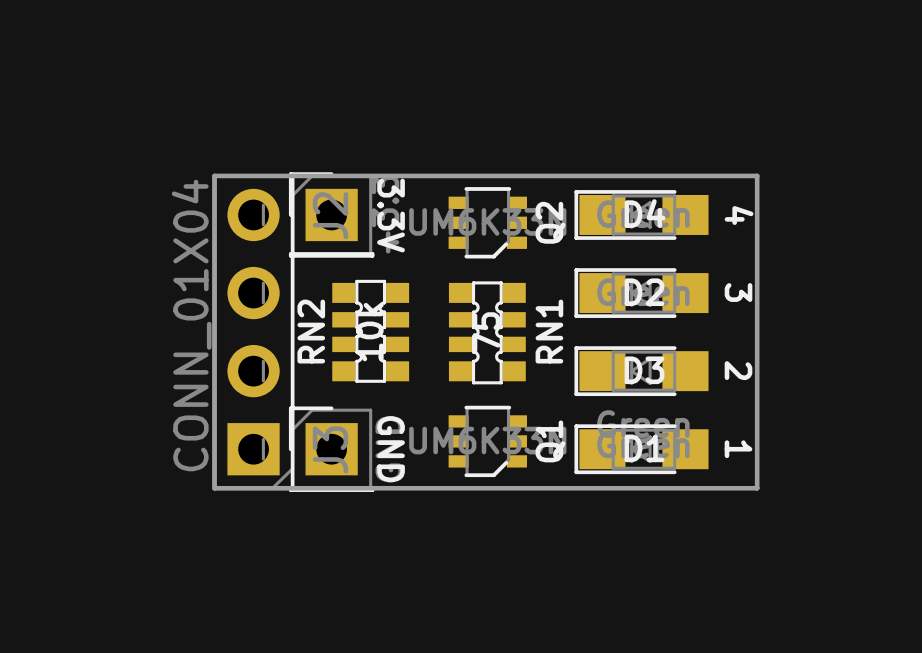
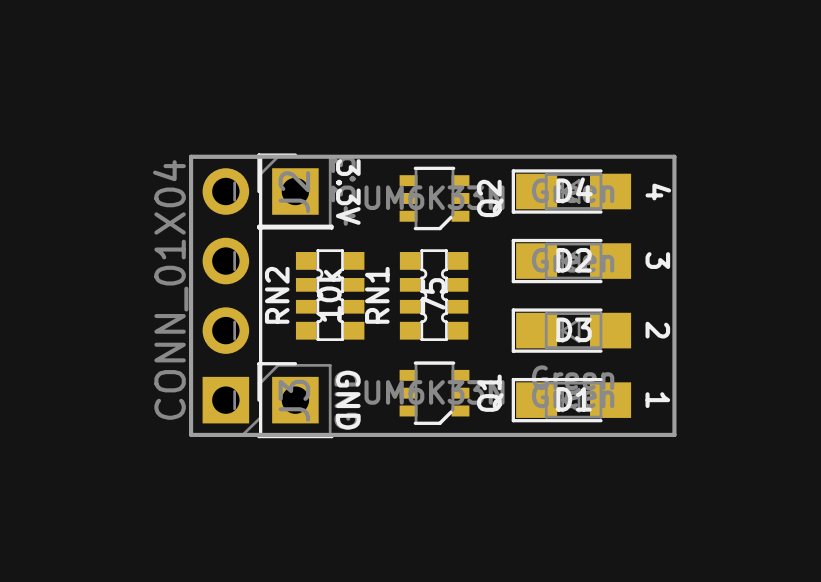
RN1 rotation: 0° (487, 332) -> 180° (434, 295)

